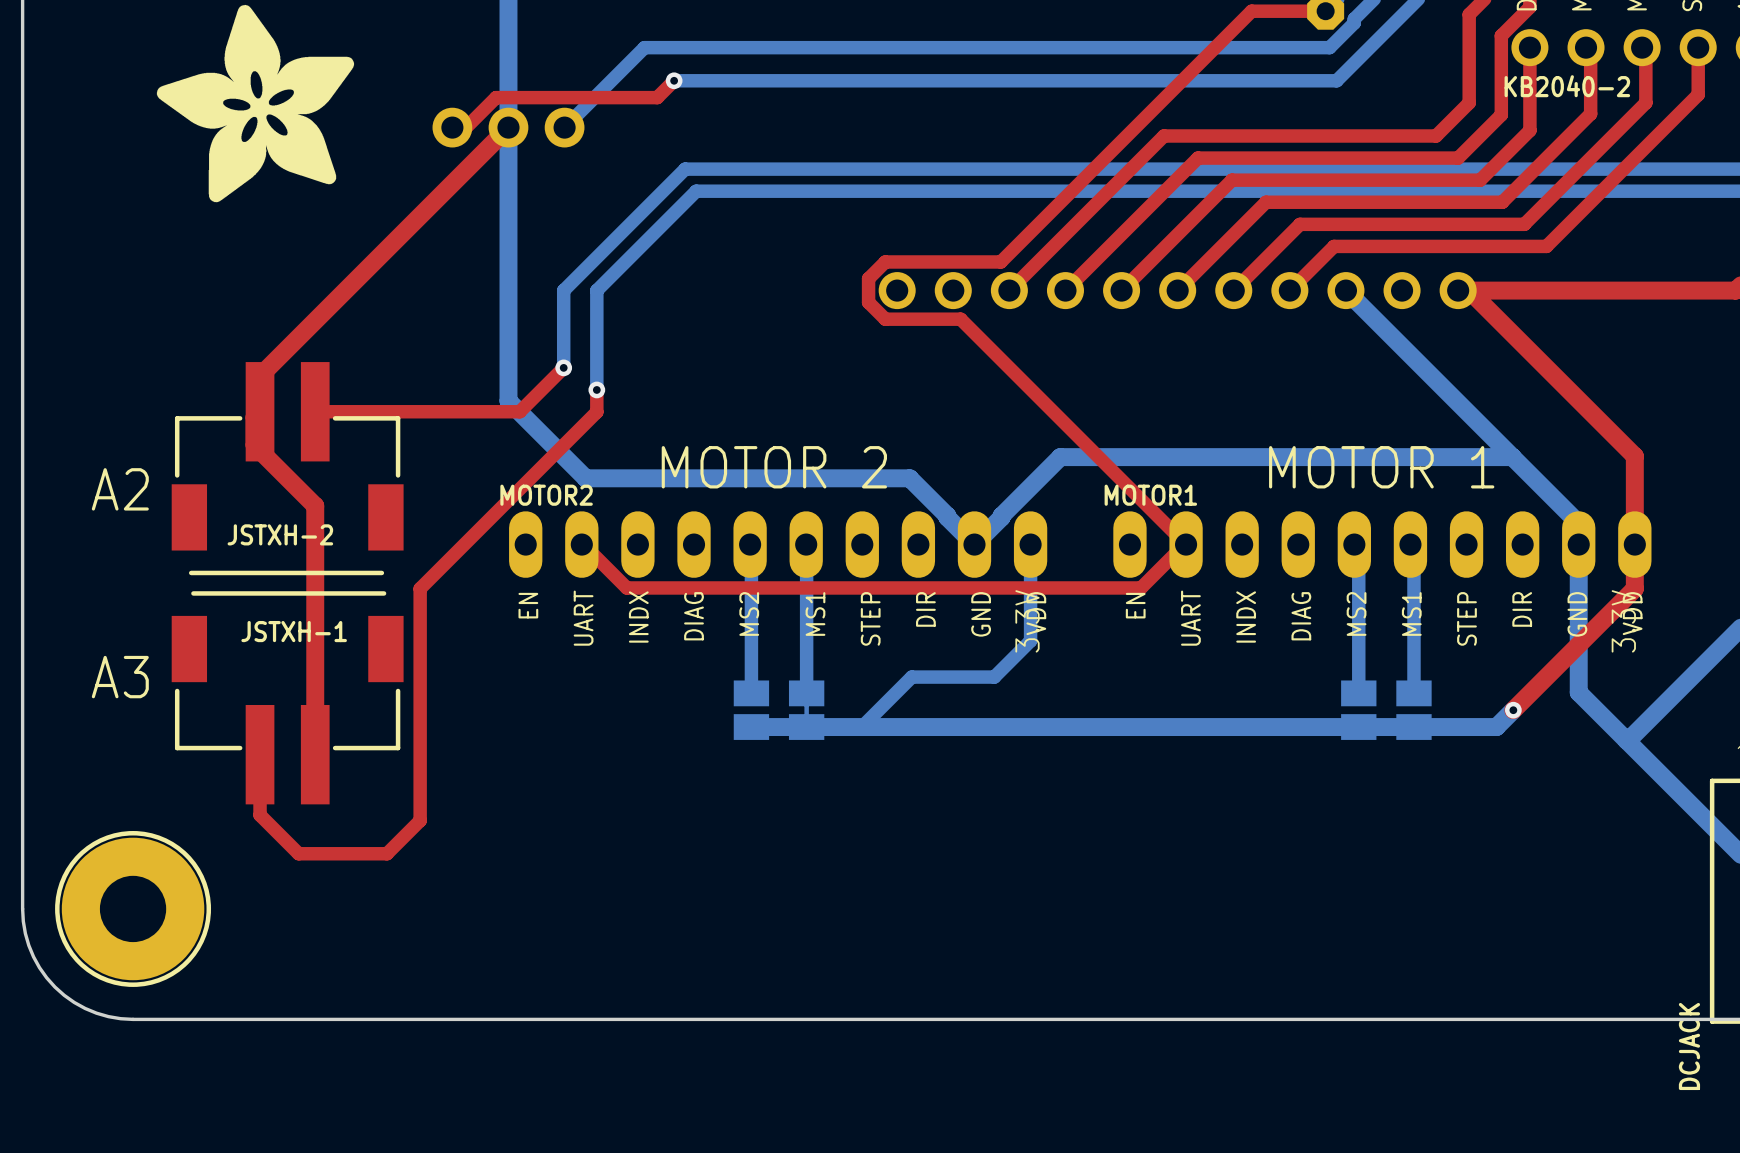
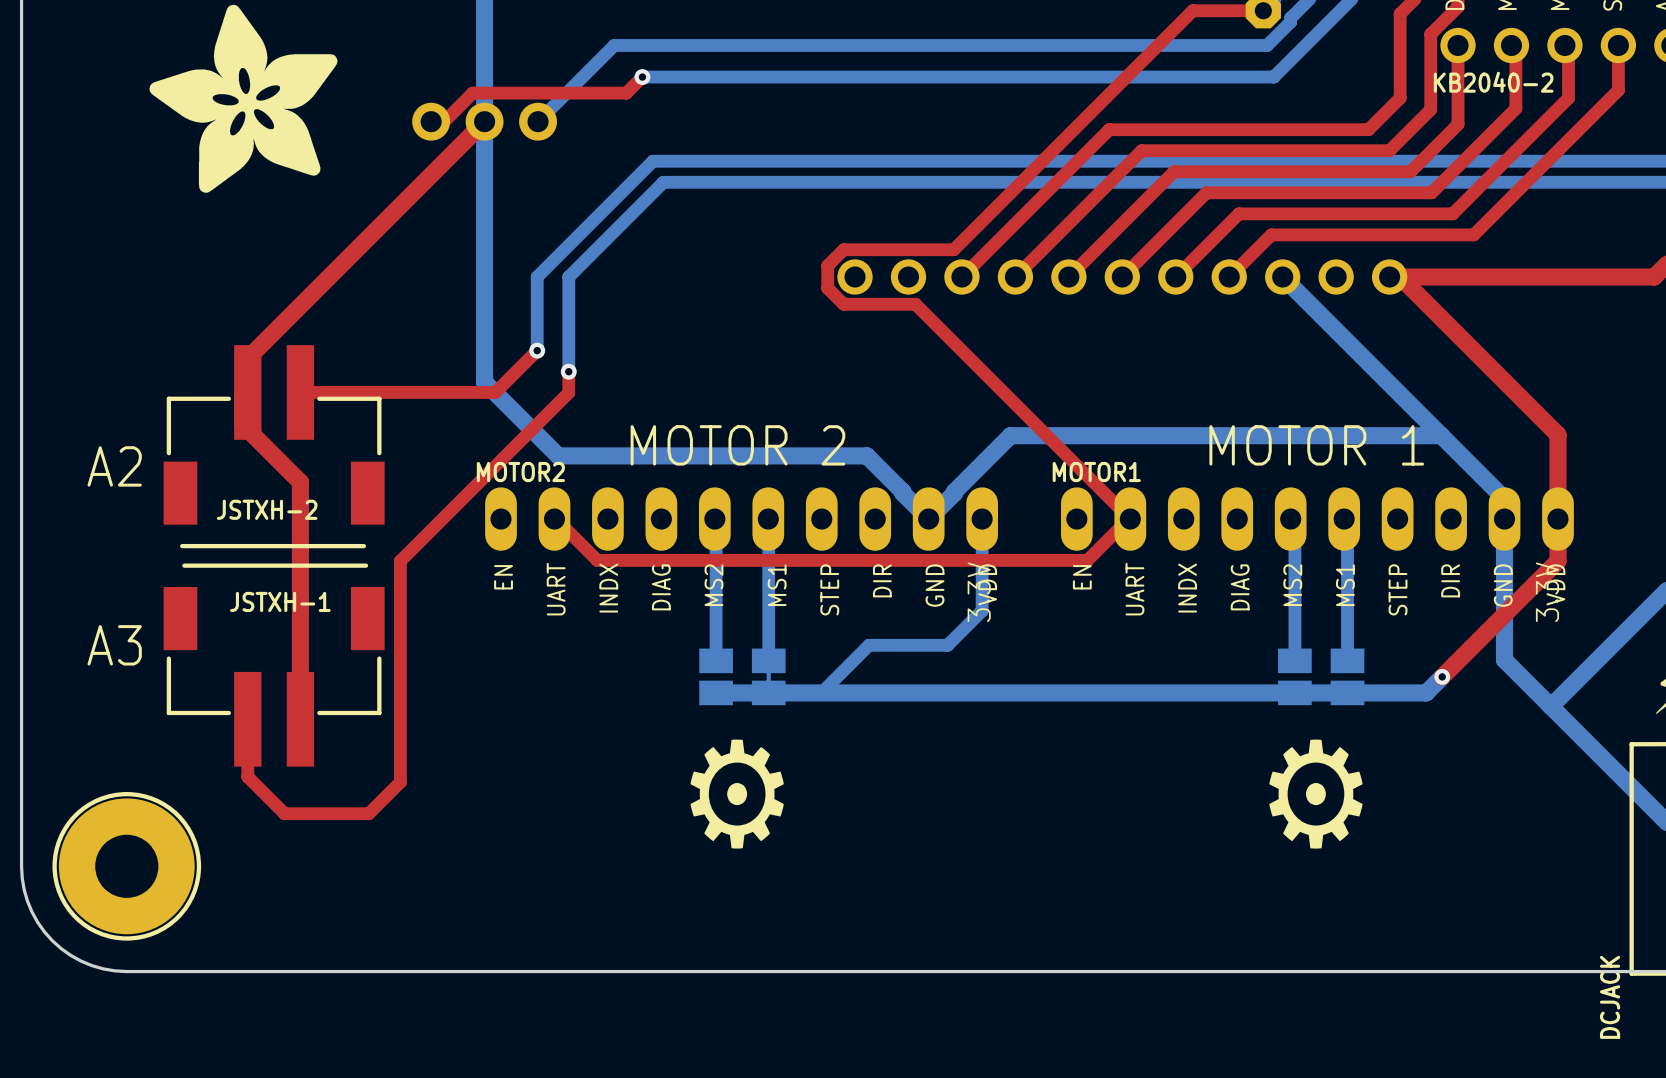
text: none -> ⚙️ (737, 794)
text: none -> ⚙️ (1315, 794)

